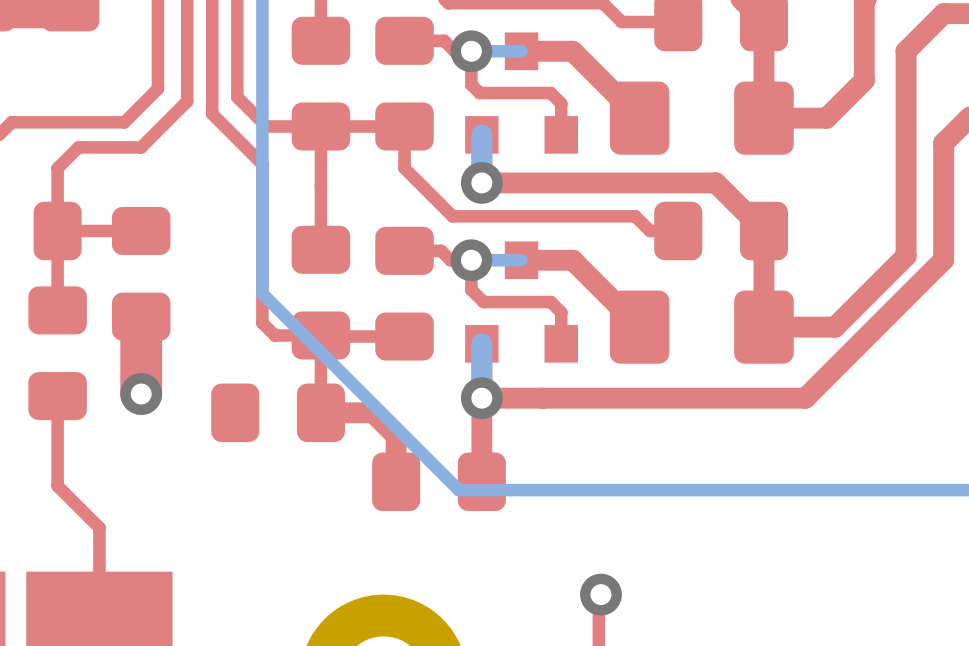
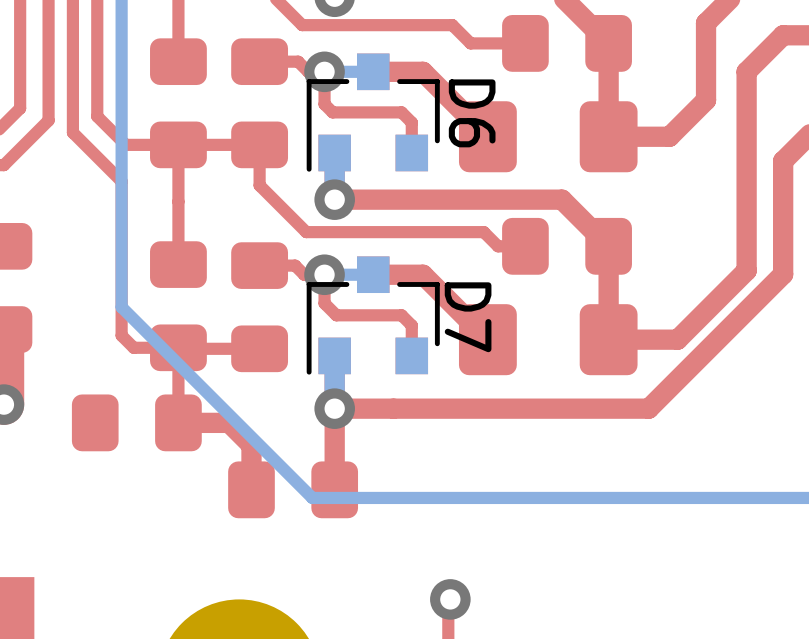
D6: none -> (373, 112)
D7: none -> (373, 315)

